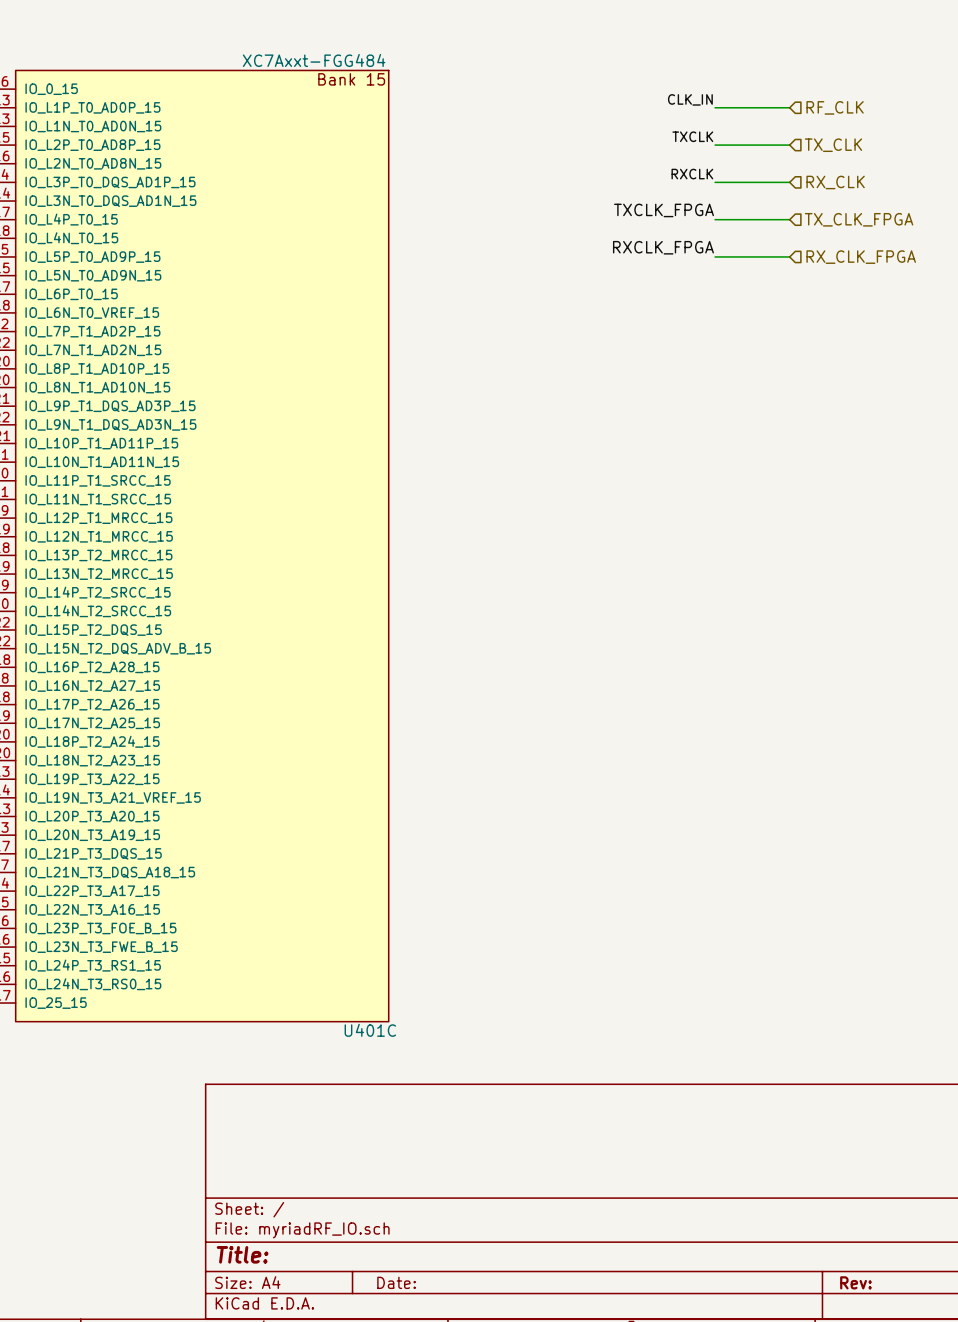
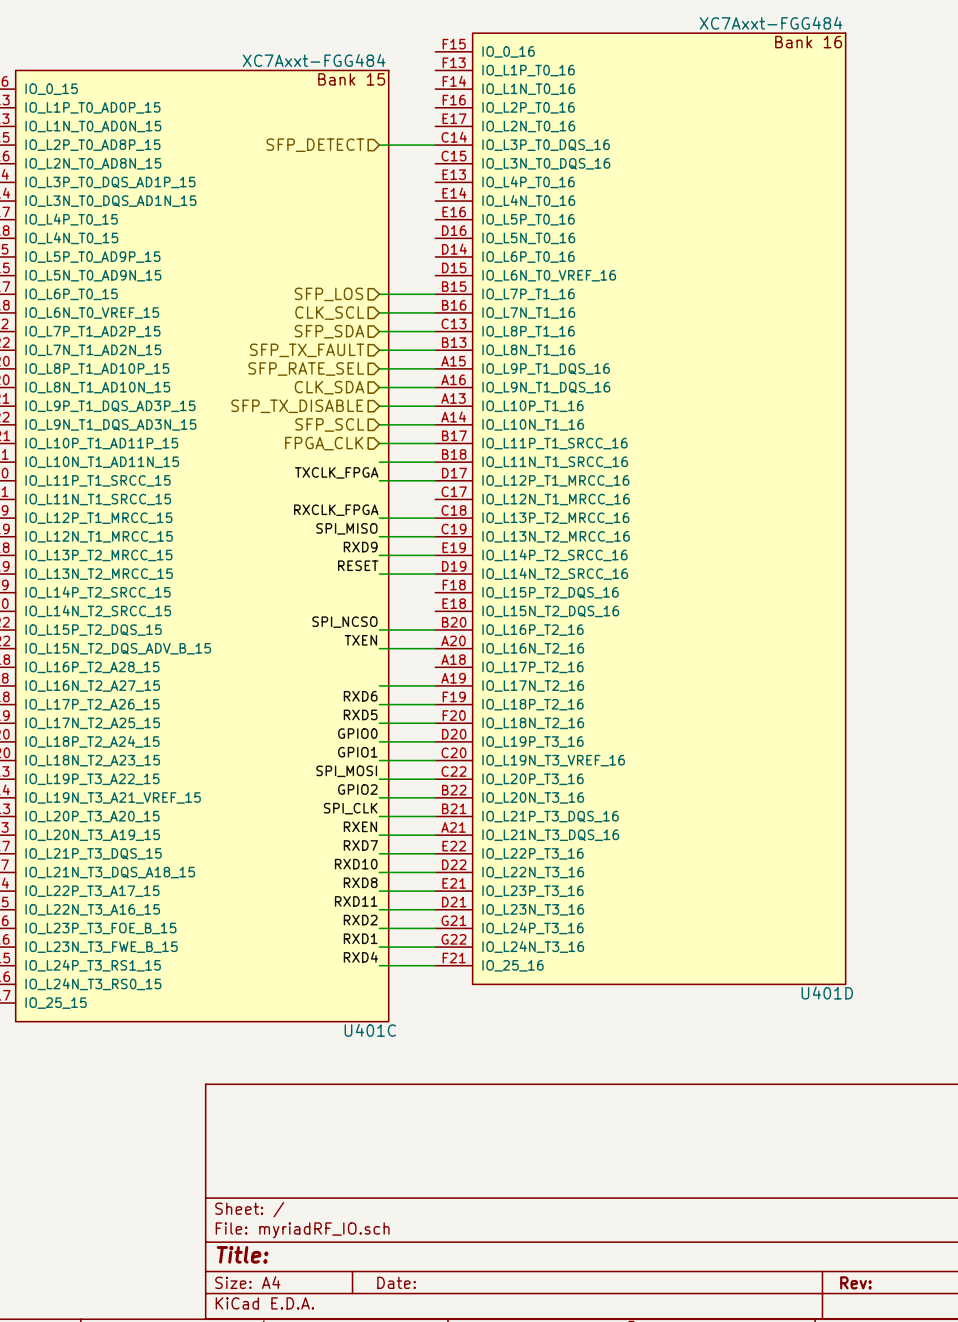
label: CLK_IN (690, 99) -> none
hierarchical label: RF_CLK (835, 107) -> none
label: TXCLK (692, 136) -> none
hierarchical label: none -> SFP_DETECT (315, 145)
wire: none -> (379, 145) (435, 145)
hierarchical label: TX_CLK (833, 145) -> none
label: RXCLK (692, 174) -> none
hierarchical label: RX_CLK (835, 182) -> none
label: TXCLK_FPGA (664, 210) -> none
hierarchical label: TX_CLK_FPGA (859, 219) -> none
label: RXCLK_FPGA (663, 247) -> none
hierarchical label: RX_CLK_FPGA (861, 257) -> none
hierarchical label: none -> SFP_LOS (328, 294)
wire: none -> (379, 294) (435, 294)
wire: none -> (379, 312) (435, 312)
hierarchical label: none -> CLK_SCL (329, 313)
hierarchical label: none -> SFP_SDA (329, 331)
wire: none -> (379, 331) (435, 331)
hierarchical label: none -> SFP_TX_FAULT (307, 350)
wire: none -> (379, 350) (435, 350)
wire: none -> (379, 368) (435, 368)
hierarchical label: none -> SFP_RATE_SEL (306, 369)
hierarchical label: none -> CLK_SDA (329, 387)
wire: none -> (379, 387) (435, 387)
hierarchical label: none -> SFP_TX_DISABLE (297, 406)
wire: none -> (379, 406) (435, 406)
hierarchical label: none -> SFP_SCL (329, 424)
wire: none -> (379, 424) (435, 424)
hierarchical label: none -> FPGA_CLK (324, 443)
wire: none -> (379, 443) (435, 443)
wire: none -> (379, 462) (435, 462)
label: none -> TXCLK_FPGA (336, 472)
wire: none -> (379, 480) (435, 480)
U401D: none -> XC7Axxt-FGG484 (640, 508)
label: none -> RXCLK_FPGA (336, 510)
wire: none -> (379, 518) (435, 518)
label: none -> SPI_MISO (346, 528)
wire: none -> (379, 536) (435, 536)
label: none -> RXD9 (360, 547)
wire: none -> (379, 555) (435, 555)
label: none -> RESET (358, 565)
wire: none -> (379, 574) (435, 574)
label: none -> SPI_NCSO (344, 622)
wire: none -> (379, 629) (435, 629)
label: none -> TXEN (360, 640)
wire: none -> (379, 648) (435, 648)
wire: none -> (379, 685) (435, 685)
label: none -> RXD6 (360, 696)
wire: none -> (379, 704) (435, 704)
label: none -> RXD5 (360, 714)
wire: none -> (379, 723) (435, 723)
label: none -> GPIO0 (357, 733)
wire: none -> (379, 741) (435, 741)
label: none -> GPIO1 (357, 752)
wire: none -> (379, 760) (435, 760)
label: none -> SPI_MOSI (346, 771)
wire: none -> (379, 779) (435, 779)
label: none -> GPIO2 (357, 789)
wire: none -> (379, 797) (435, 797)
label: none -> SPI_CLK (350, 808)
wire: none -> (379, 816) (435, 816)
label: none -> RXEN (360, 826)
wire: none -> (379, 835) (435, 835)
label: none -> RXD7 (360, 845)
wire: none -> (379, 853) (435, 853)
label: none -> RXD10 (356, 864)
wire: none -> (379, 872) (435, 872)
label: none -> RXD8 (360, 882)
wire: none -> (379, 891) (435, 891)
label: none -> RXD11 (356, 901)
wire: none -> (379, 909) (435, 909)
label: none -> RXD2 (360, 920)
wire: none -> (379, 928) (435, 928)
label: none -> RXD1 (360, 938)
wire: none -> (379, 947) (435, 947)
label: none -> RXD4 (360, 957)
wire: none -> (379, 965) (435, 965)

